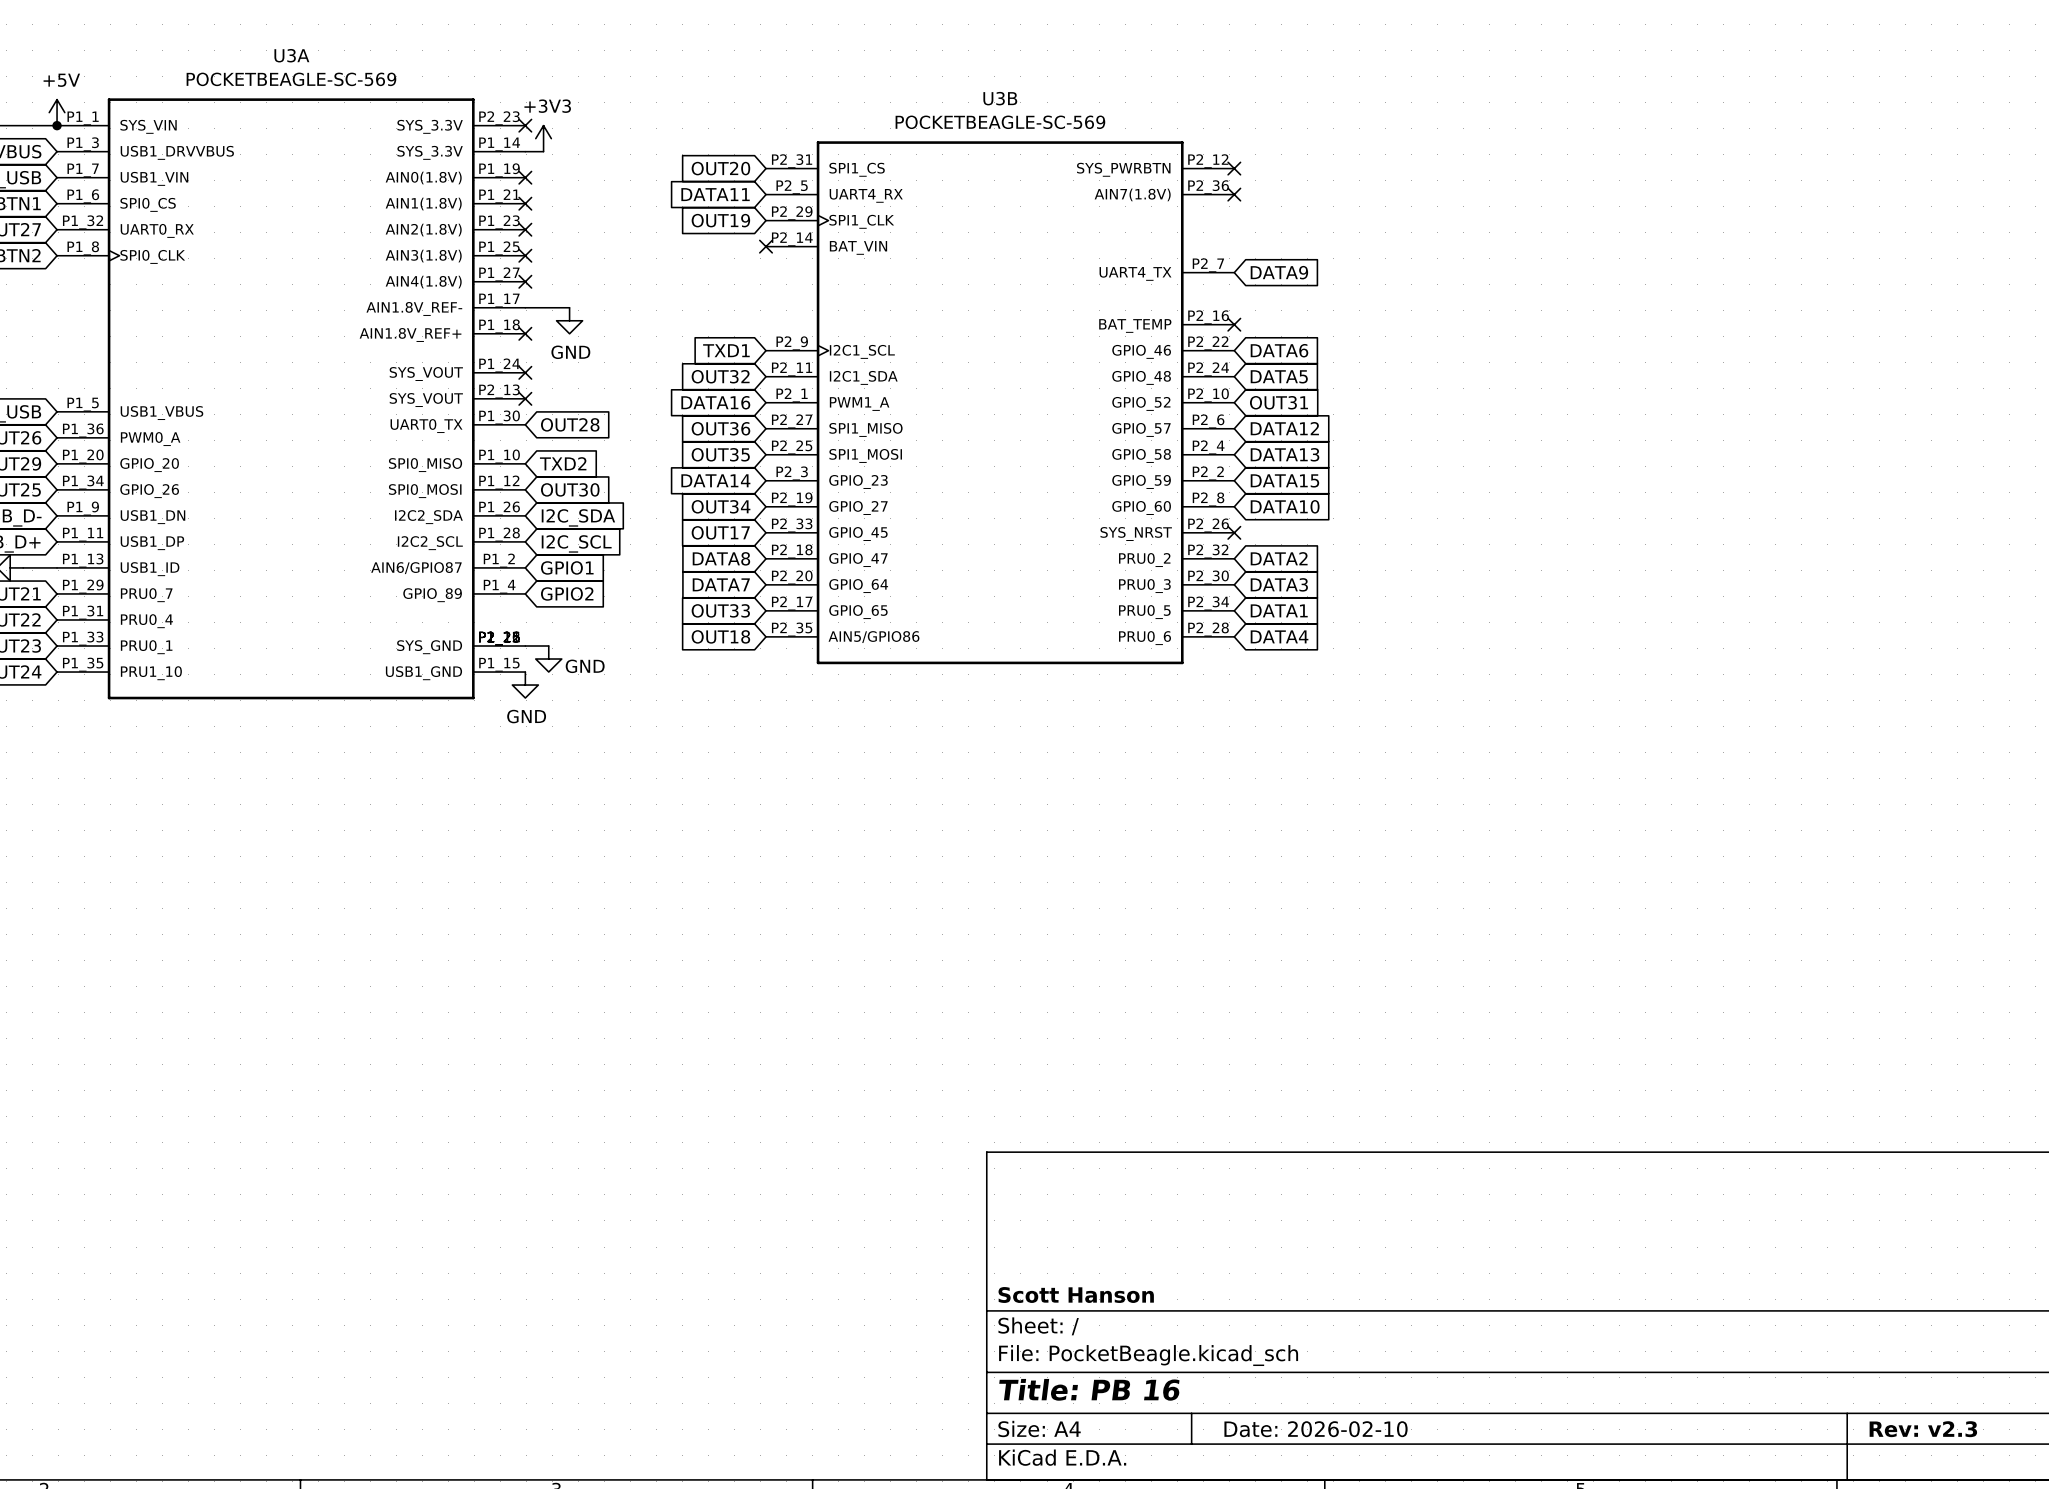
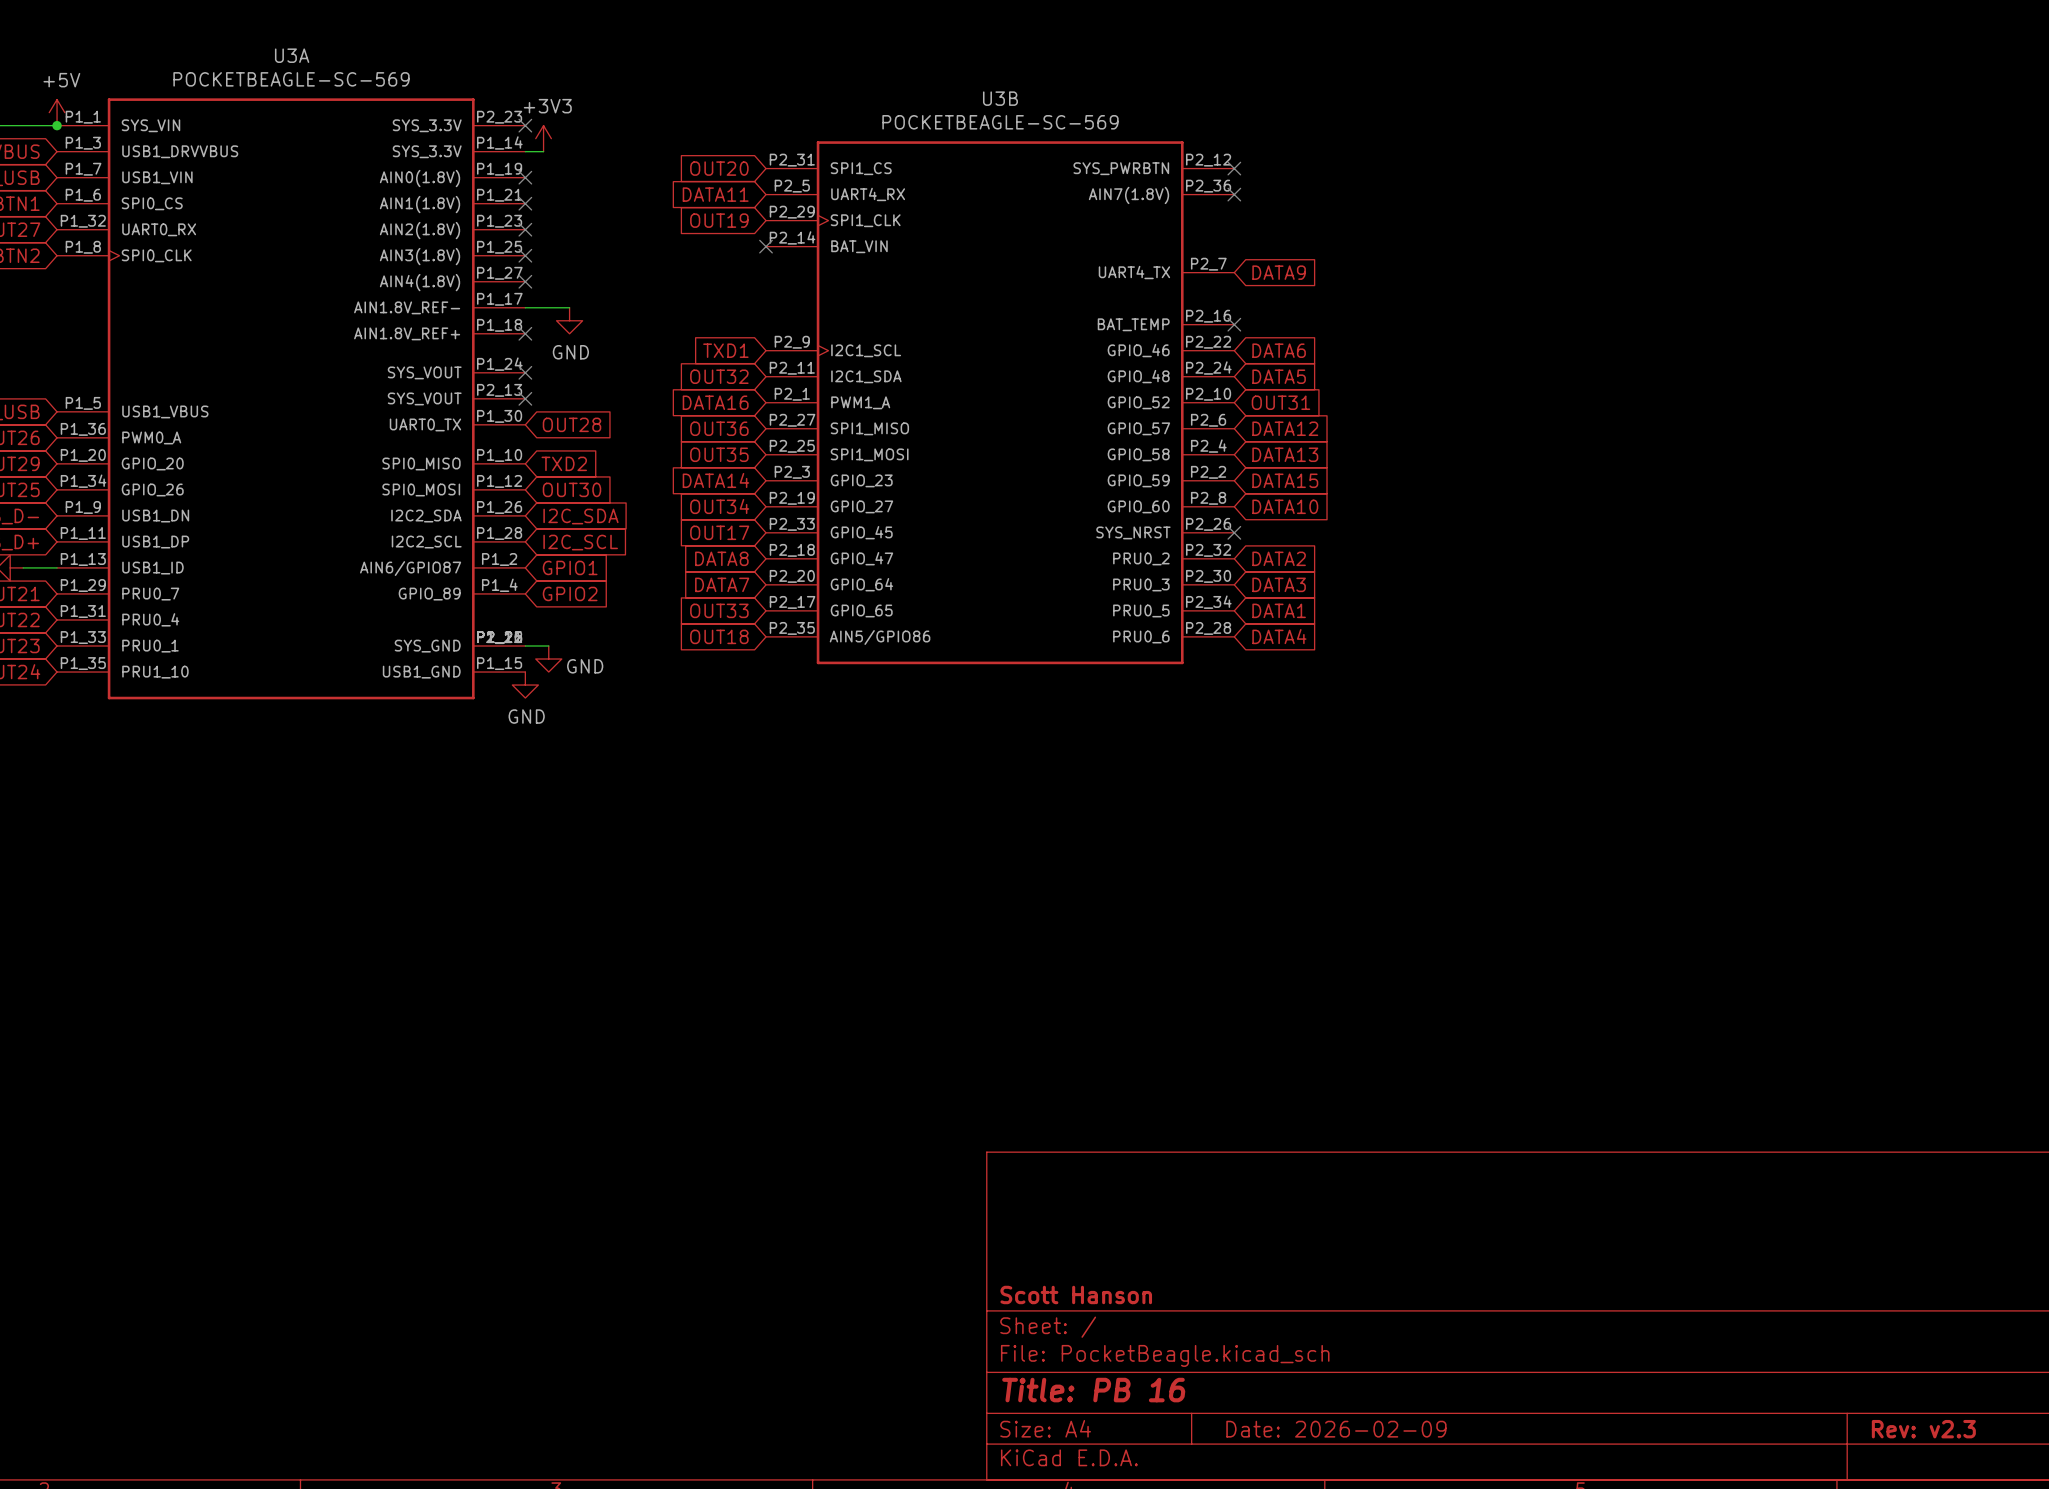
title block: Date: 2026-02-10 (1316, 1429) -> Date: 2026-02-09 (1336, 1429)

